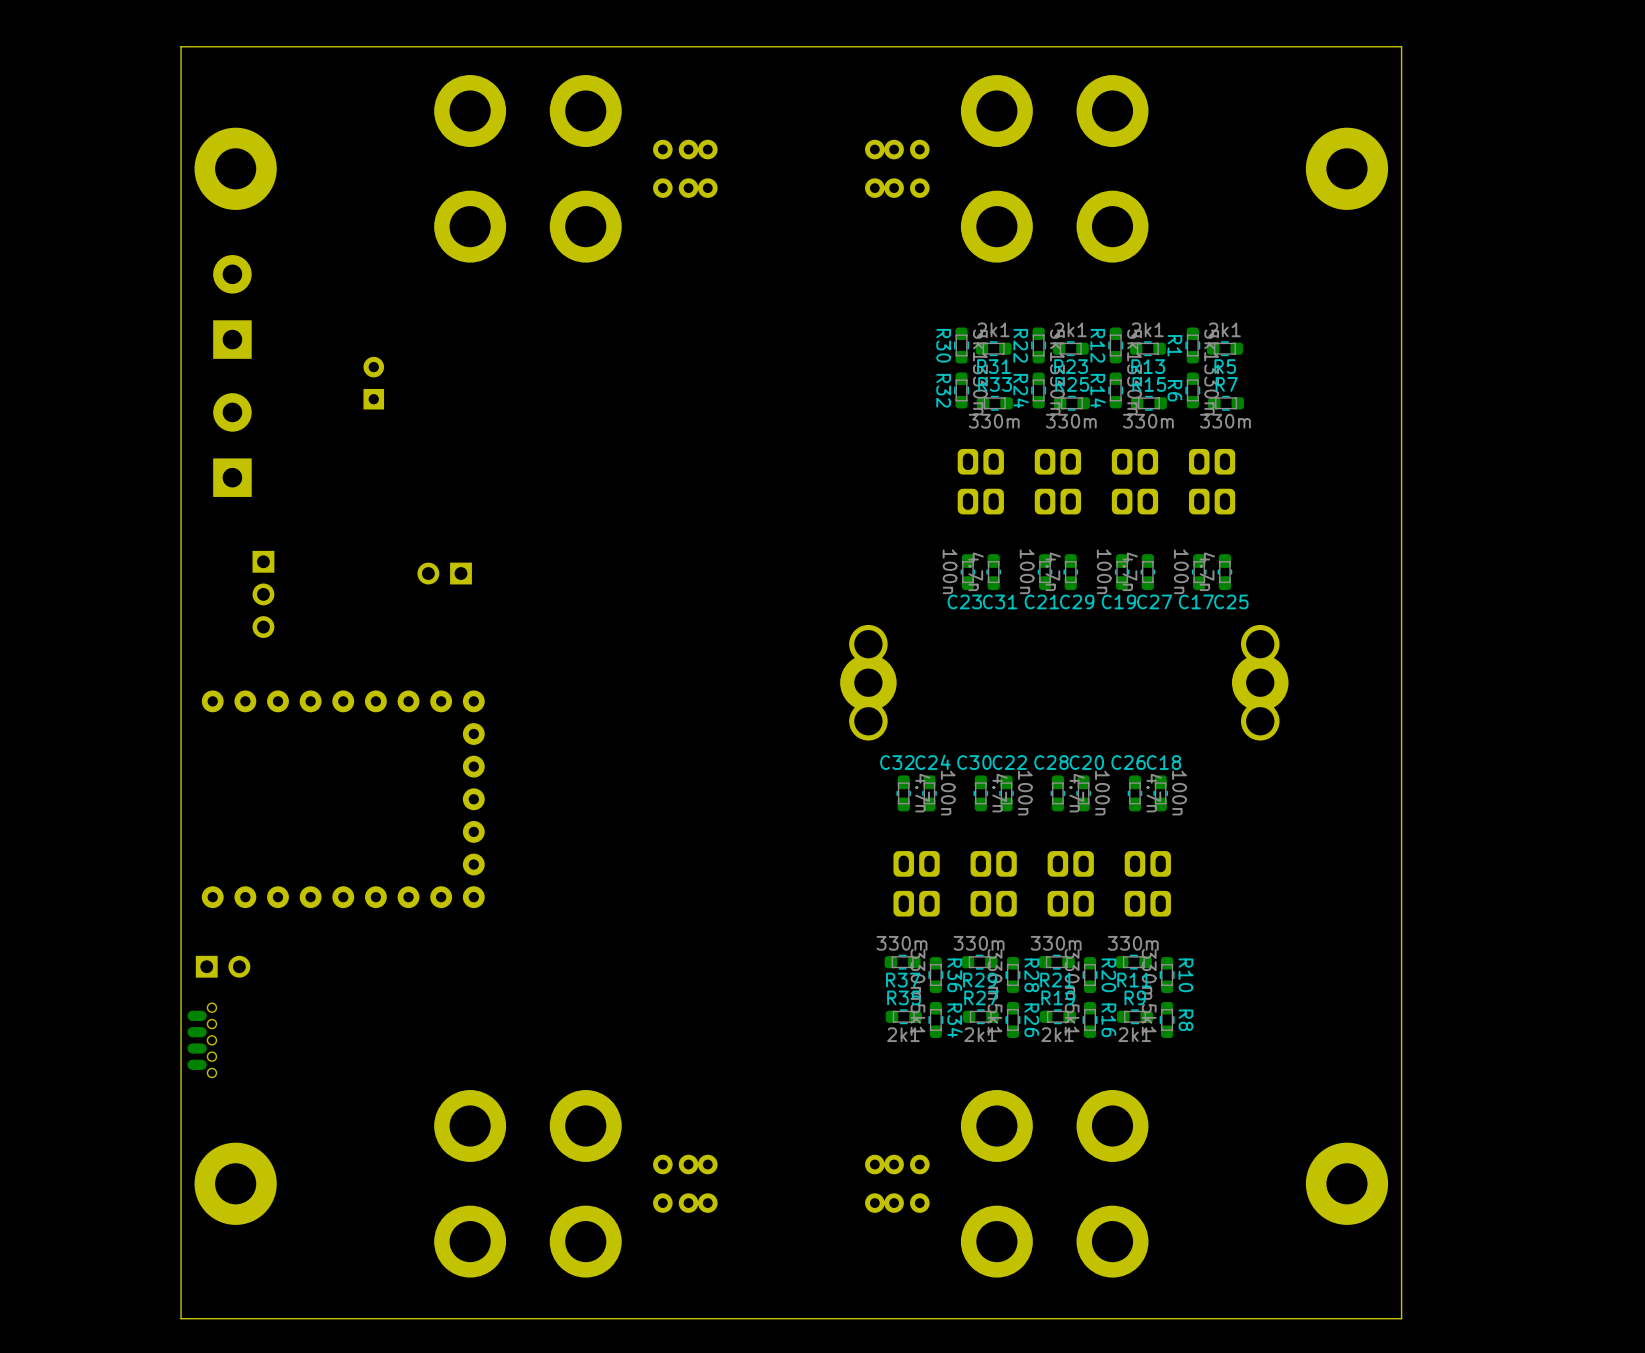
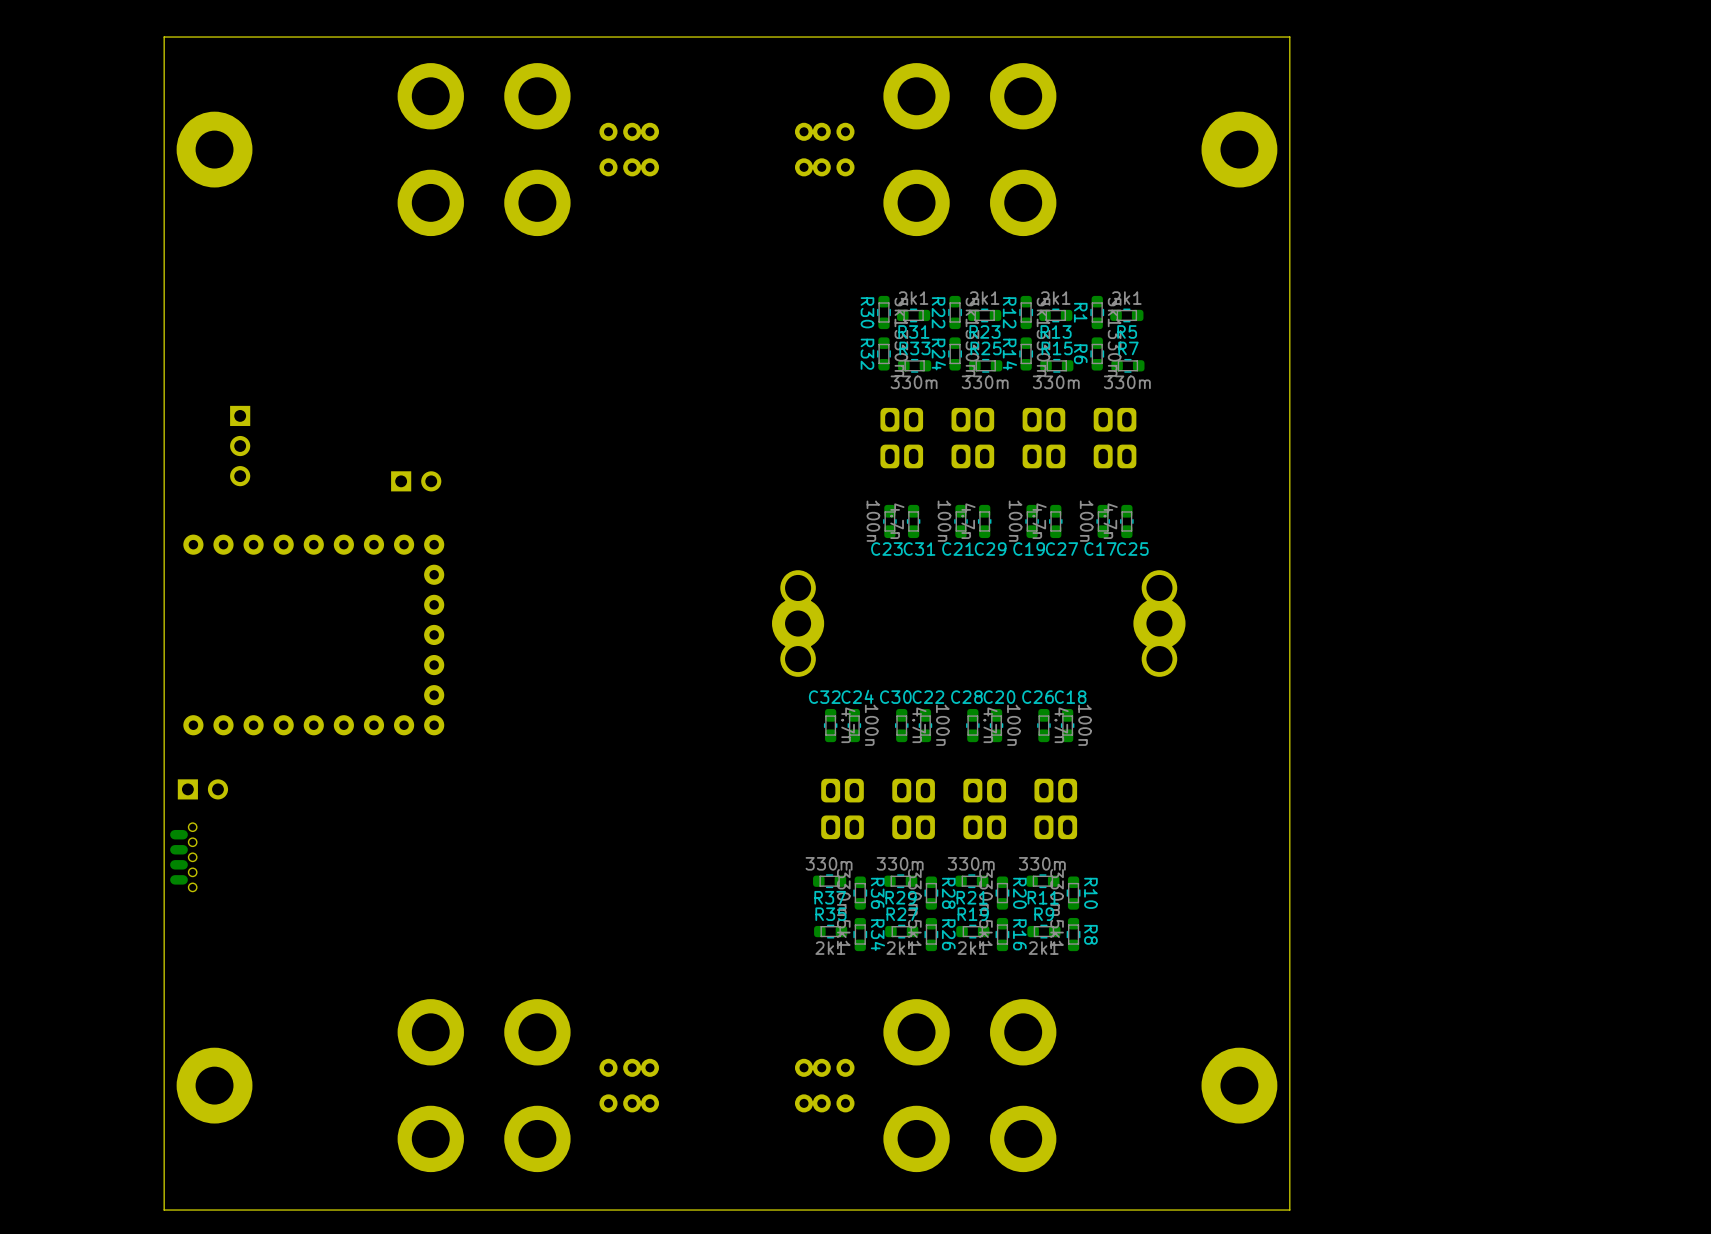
part: (232, 306) -> none
part: (373, 383) -> none
part: (232, 445) -> none
part rotation: 0° (444, 573) -> 180° (416, 481)
part position: (444, 573) -> (416, 481)
part position: (263, 594) -> (240, 446)
part position: (343, 799) -> (313, 634)
part position: (223, 966) -> (202, 789)
part position: (201, 1040) -> (183, 857)

